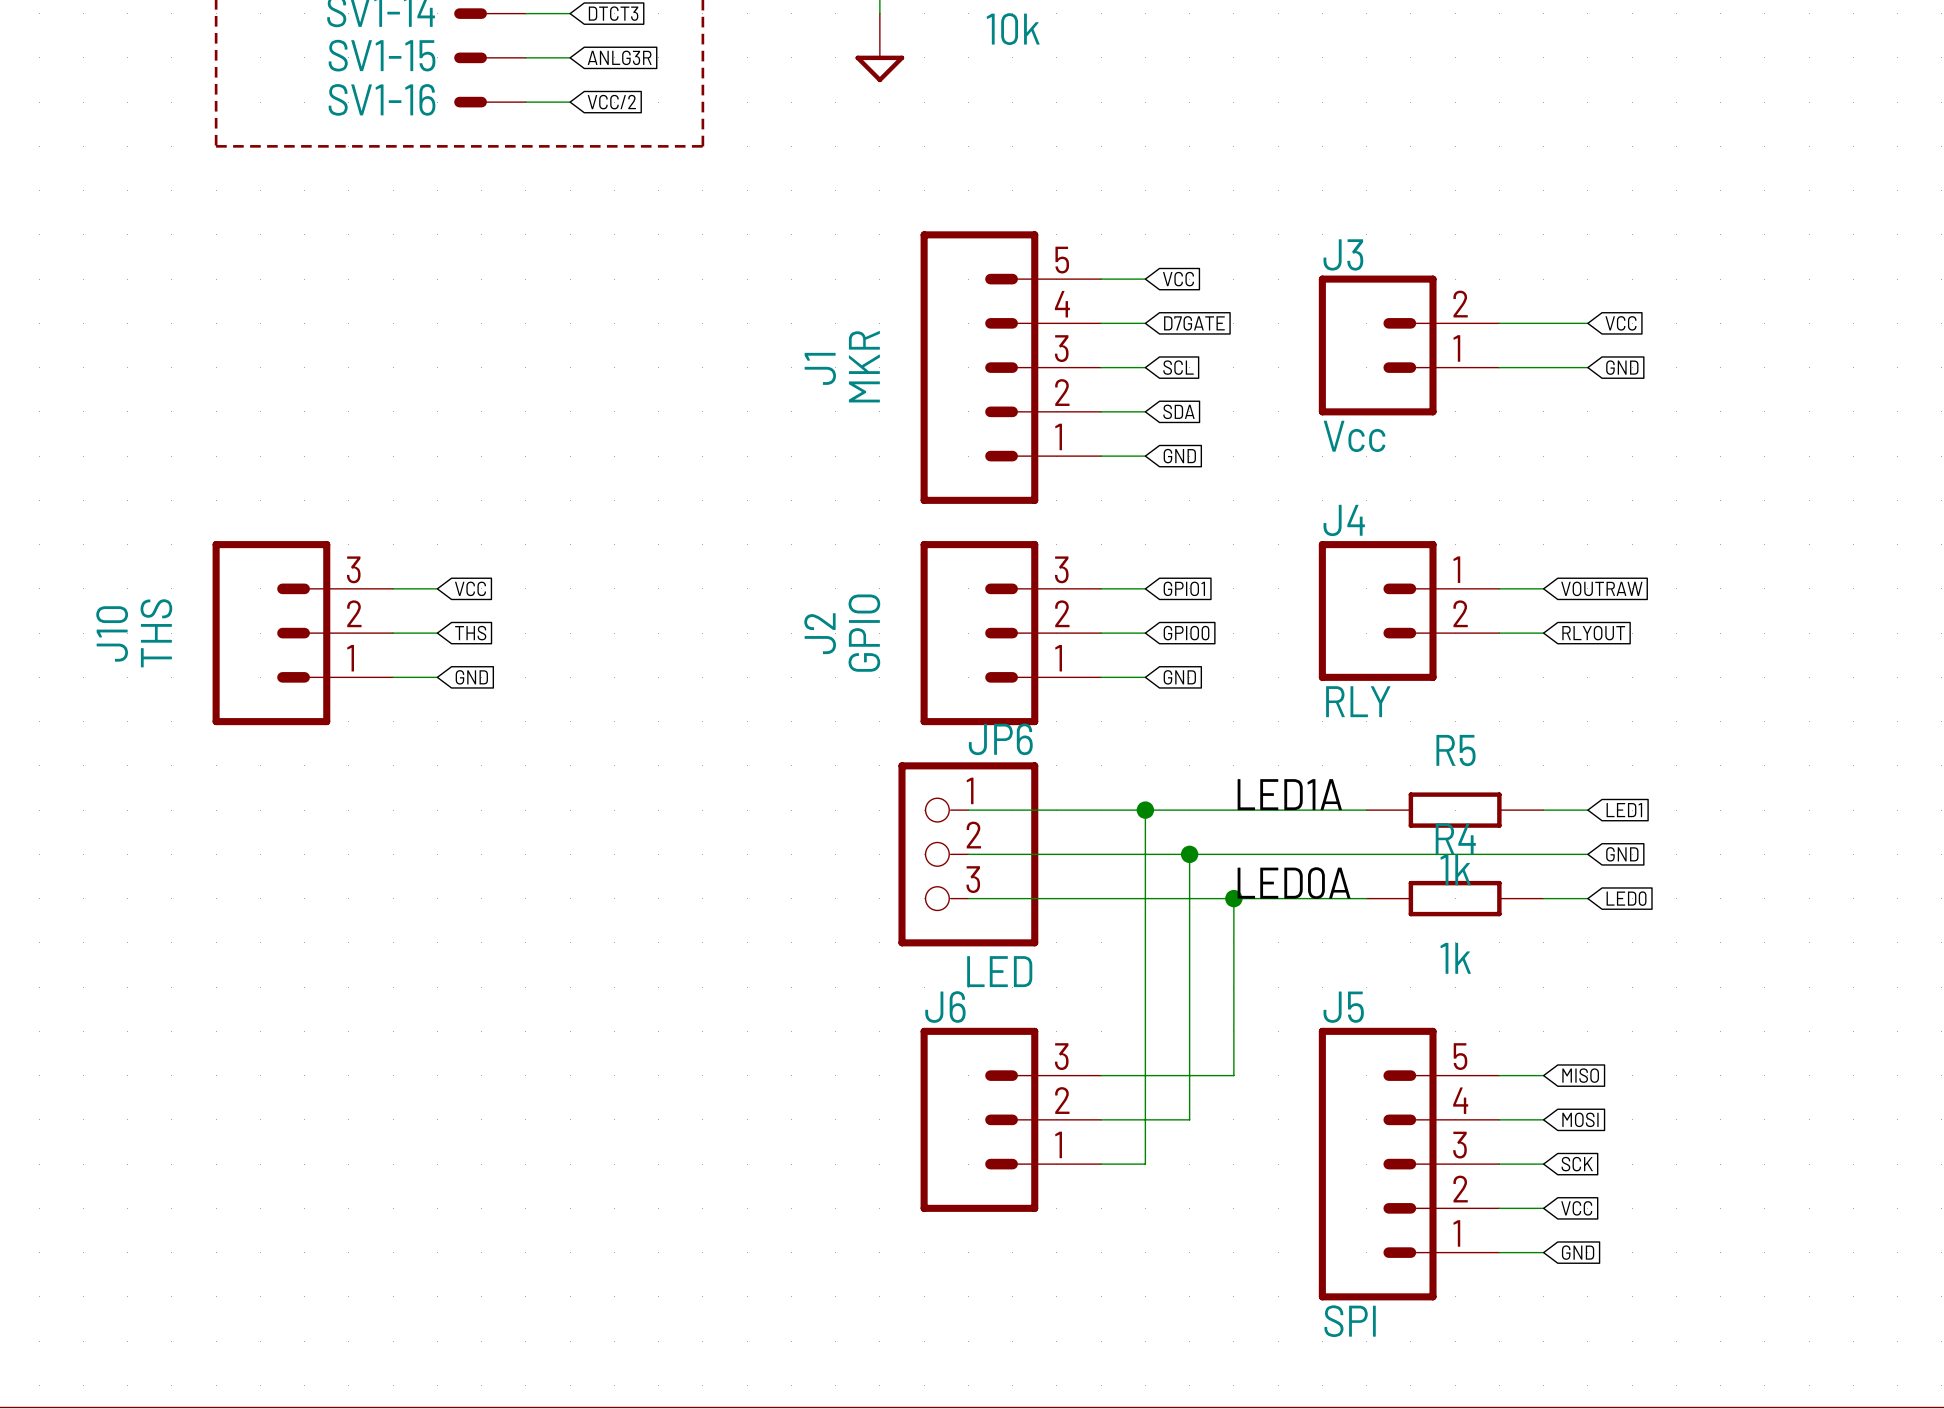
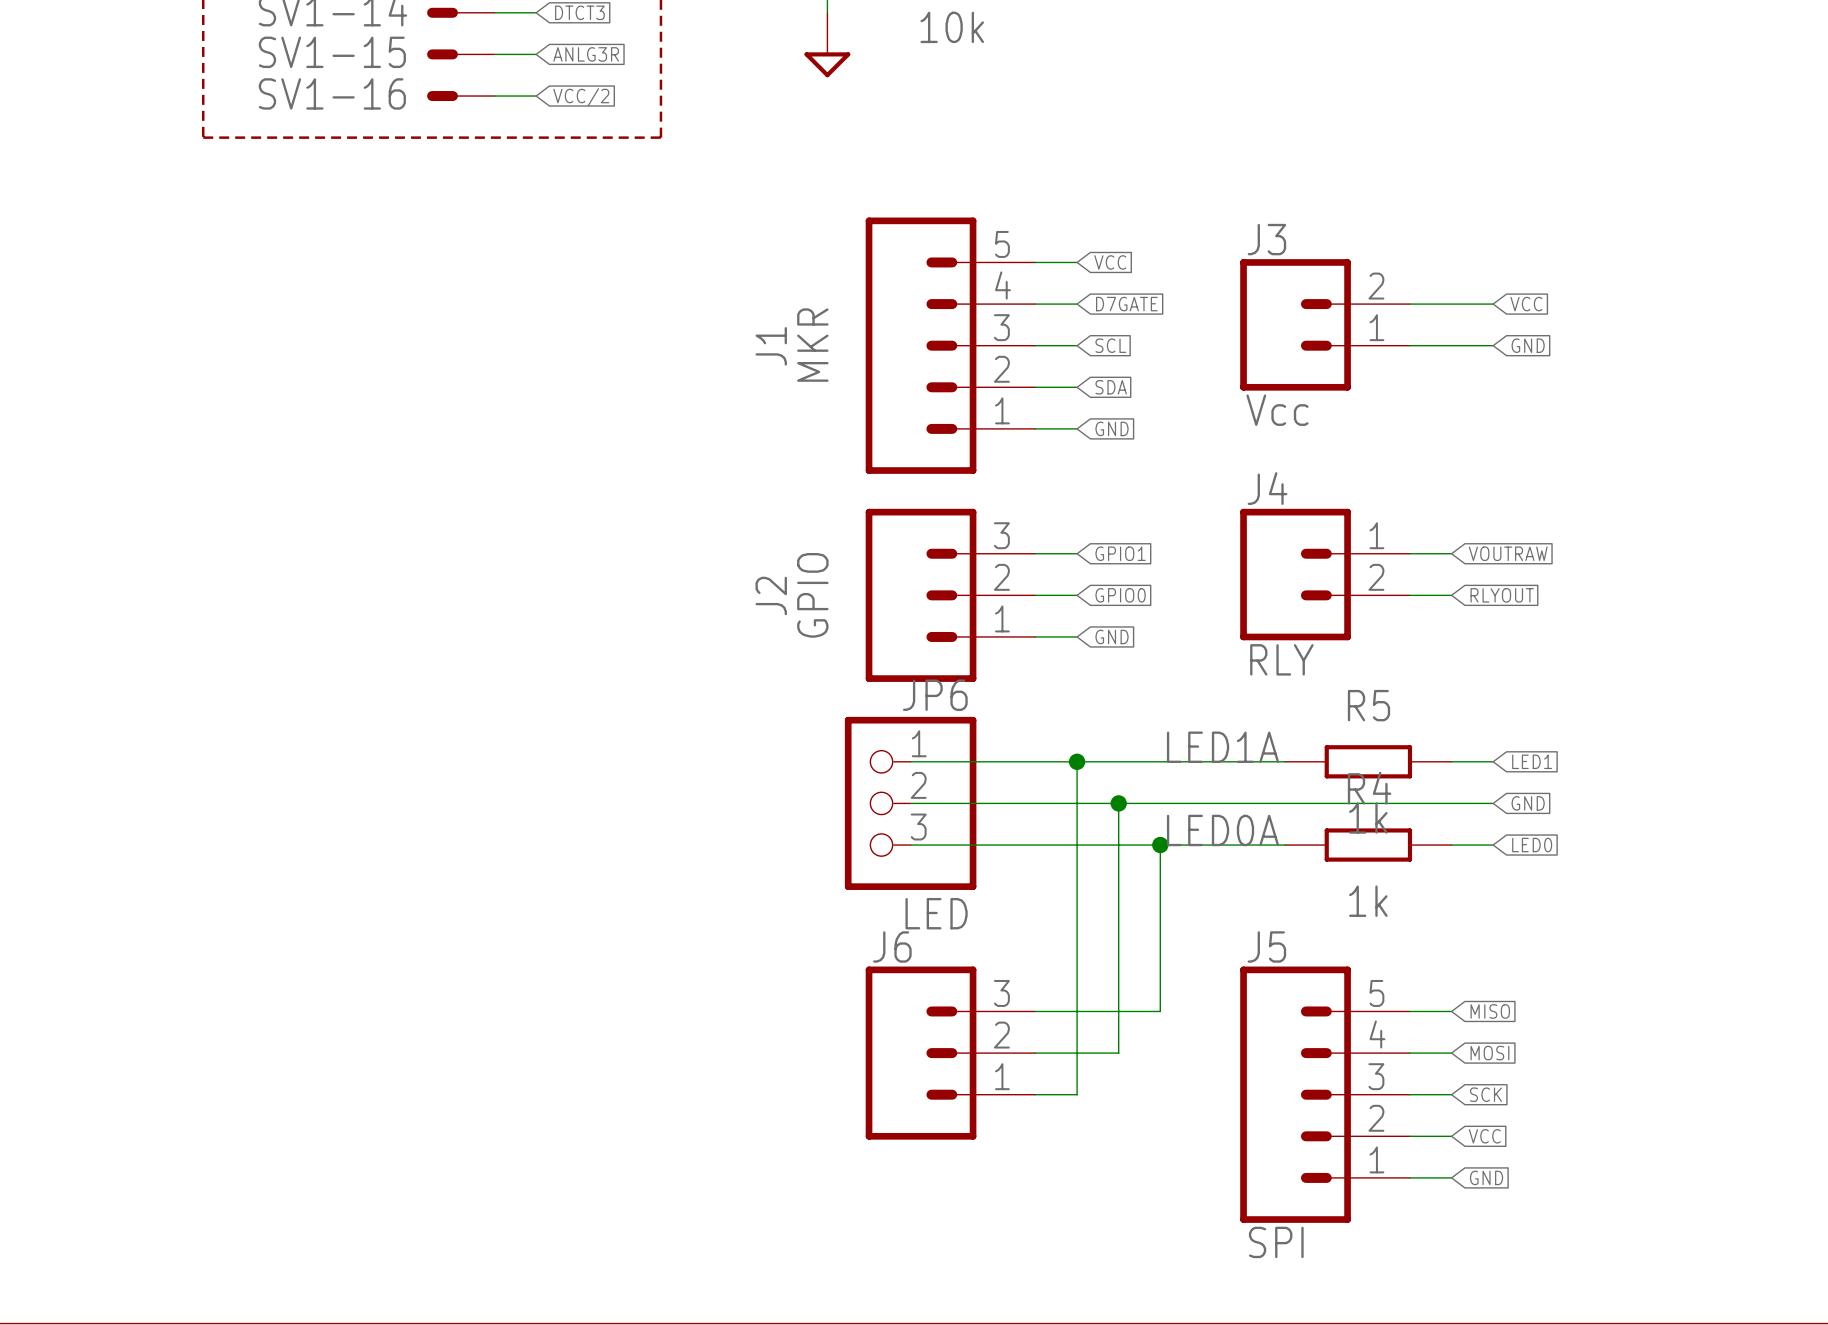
wire: (393, 588) (437, 588) -> none
global label: VCC (470, 588) -> none
J10: THS (302, 633) -> none
wire: (393, 633) (437, 633) -> none
global label: THS (470, 633) -> none
wire: (393, 677) (437, 677) -> none
global label: GND (471, 677) -> none

